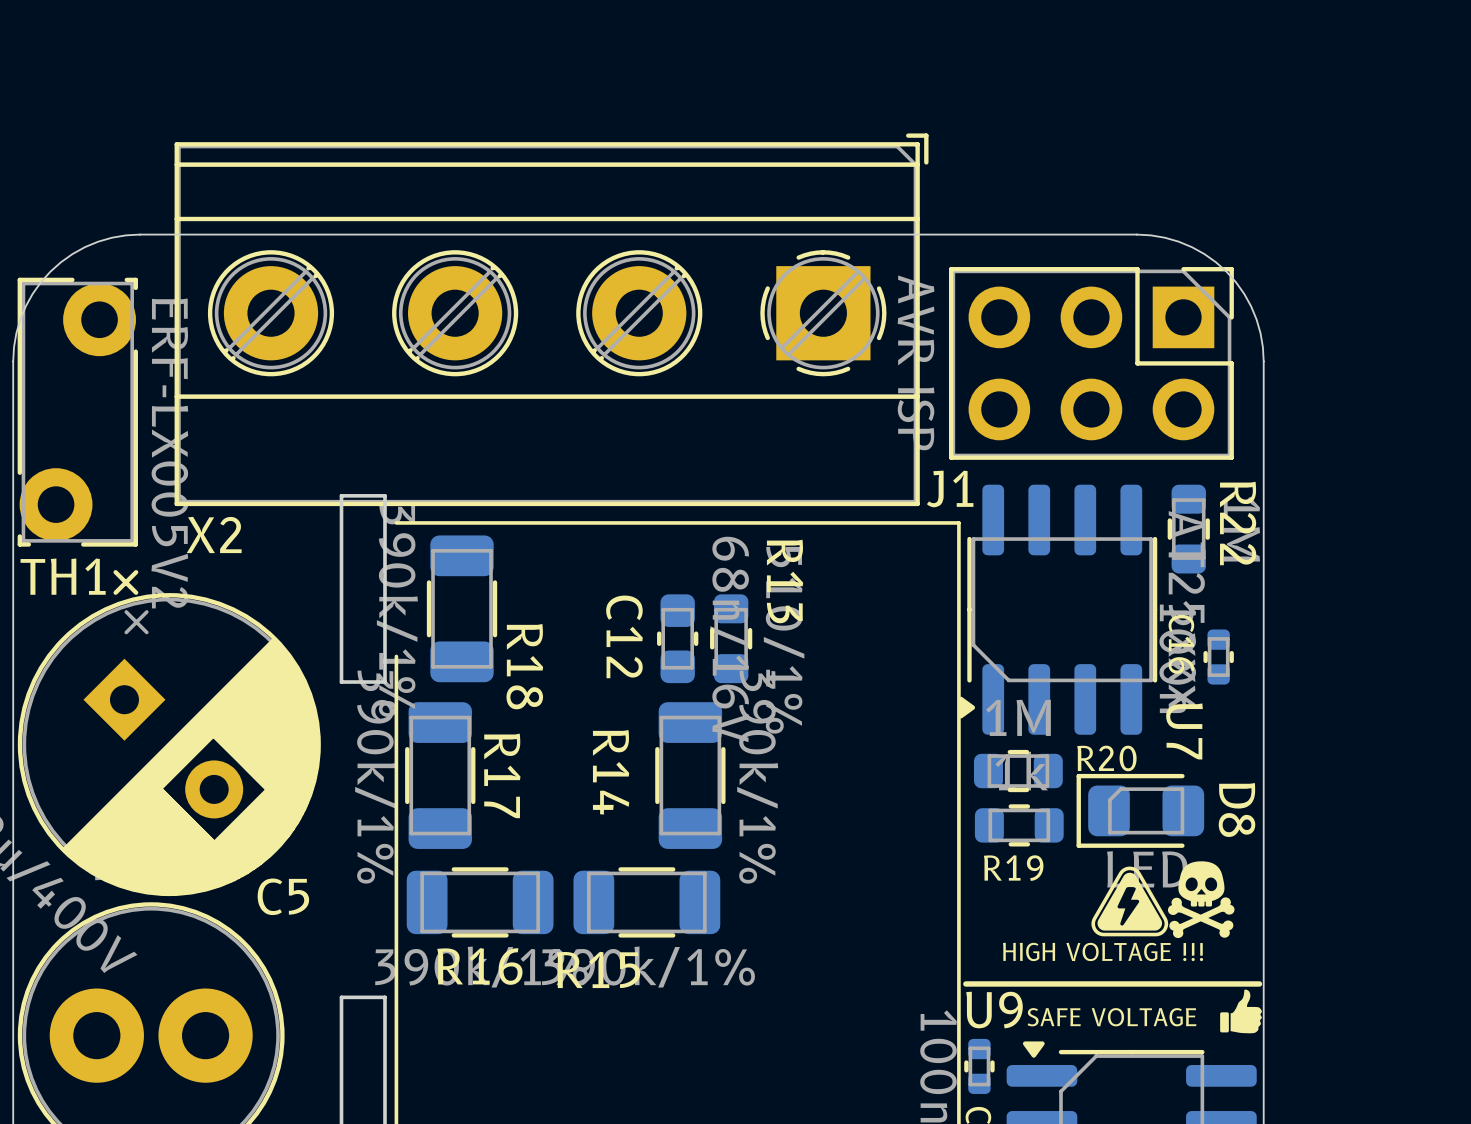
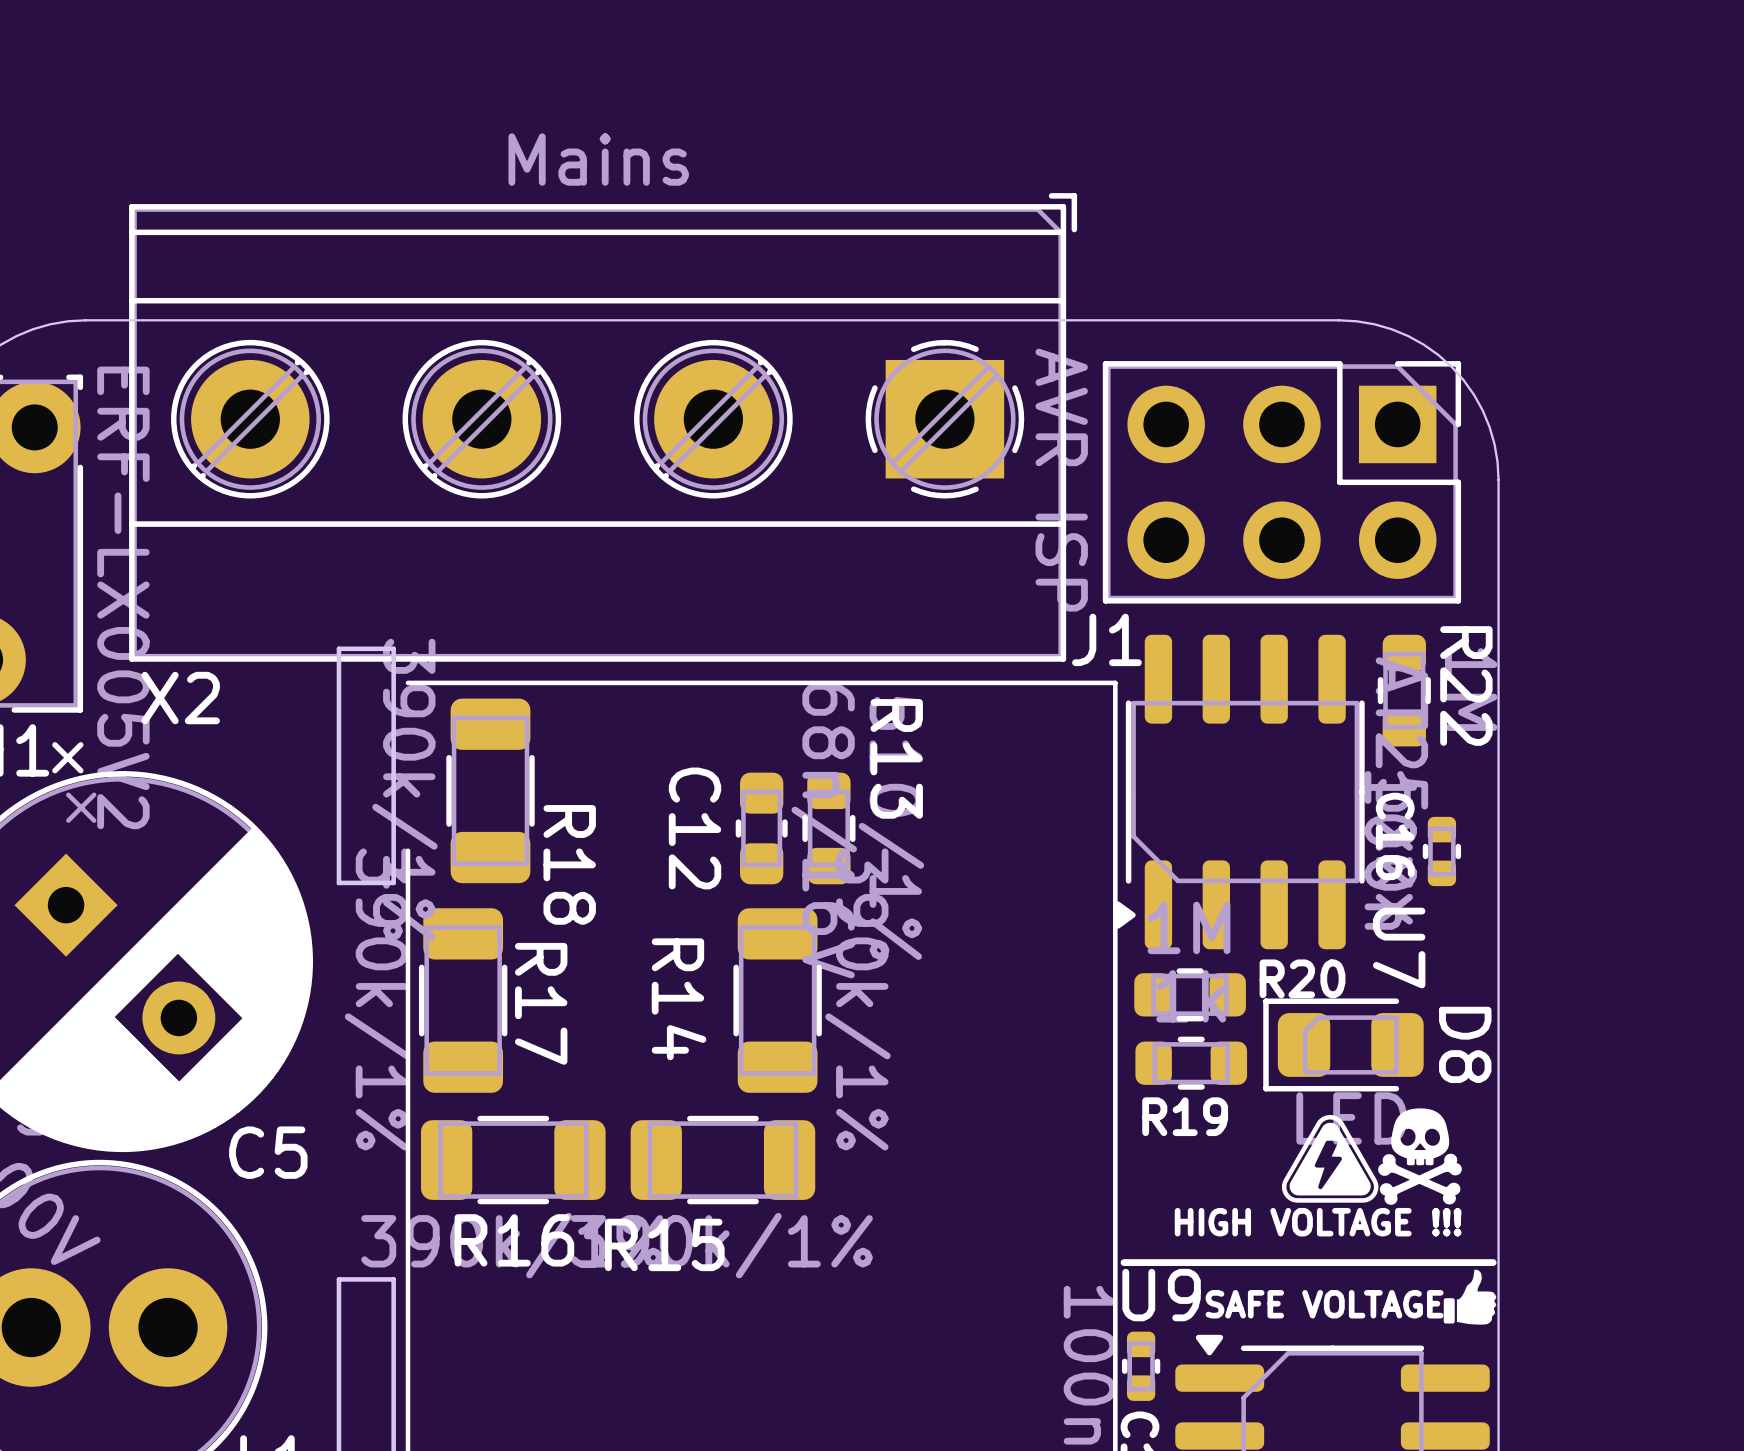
X2 value: none -> Mains (598, 159)

